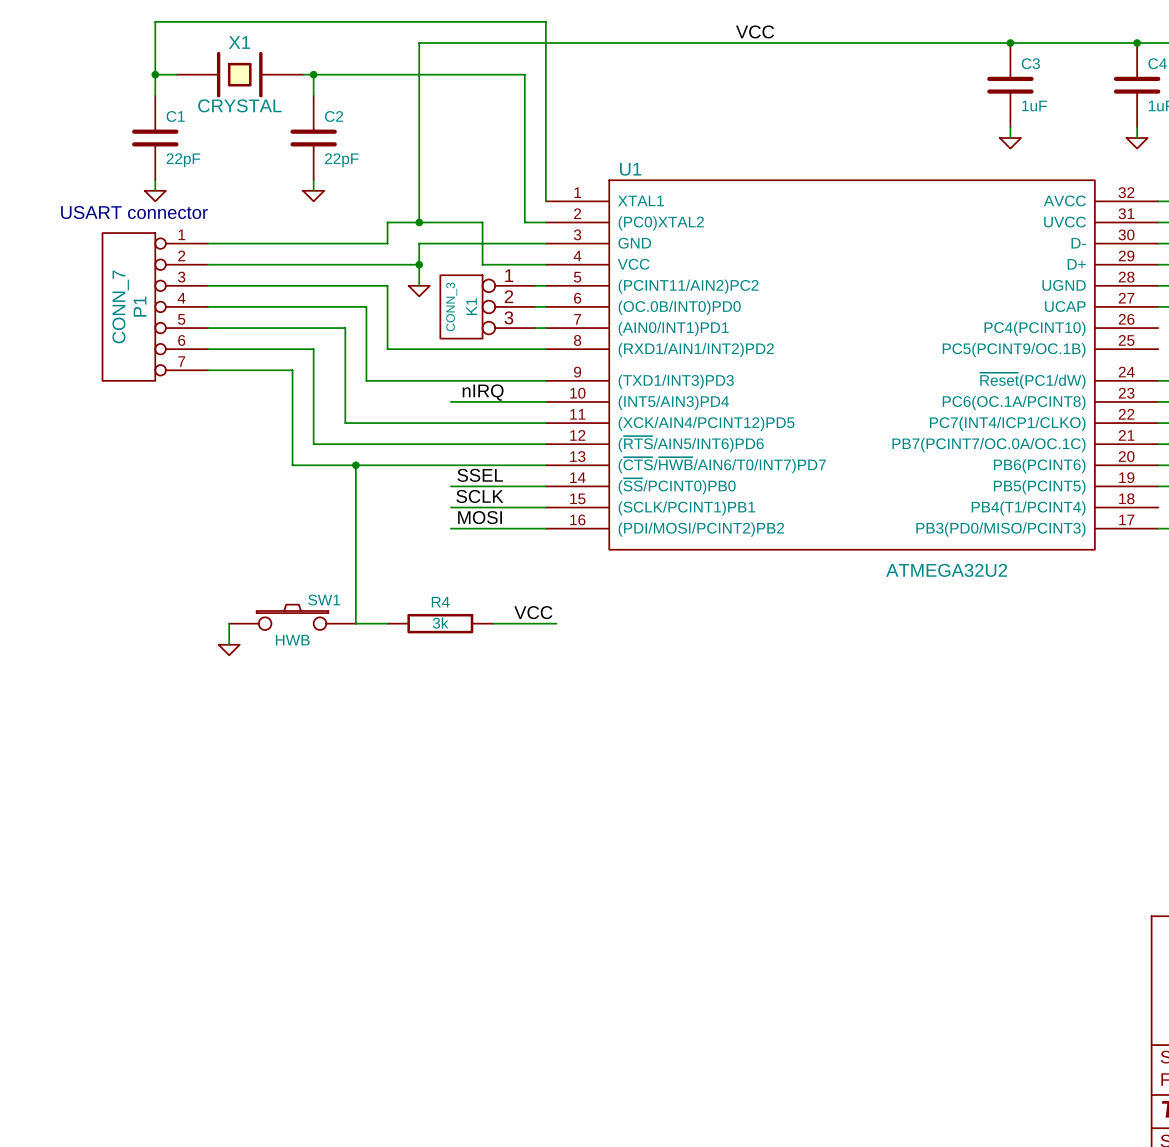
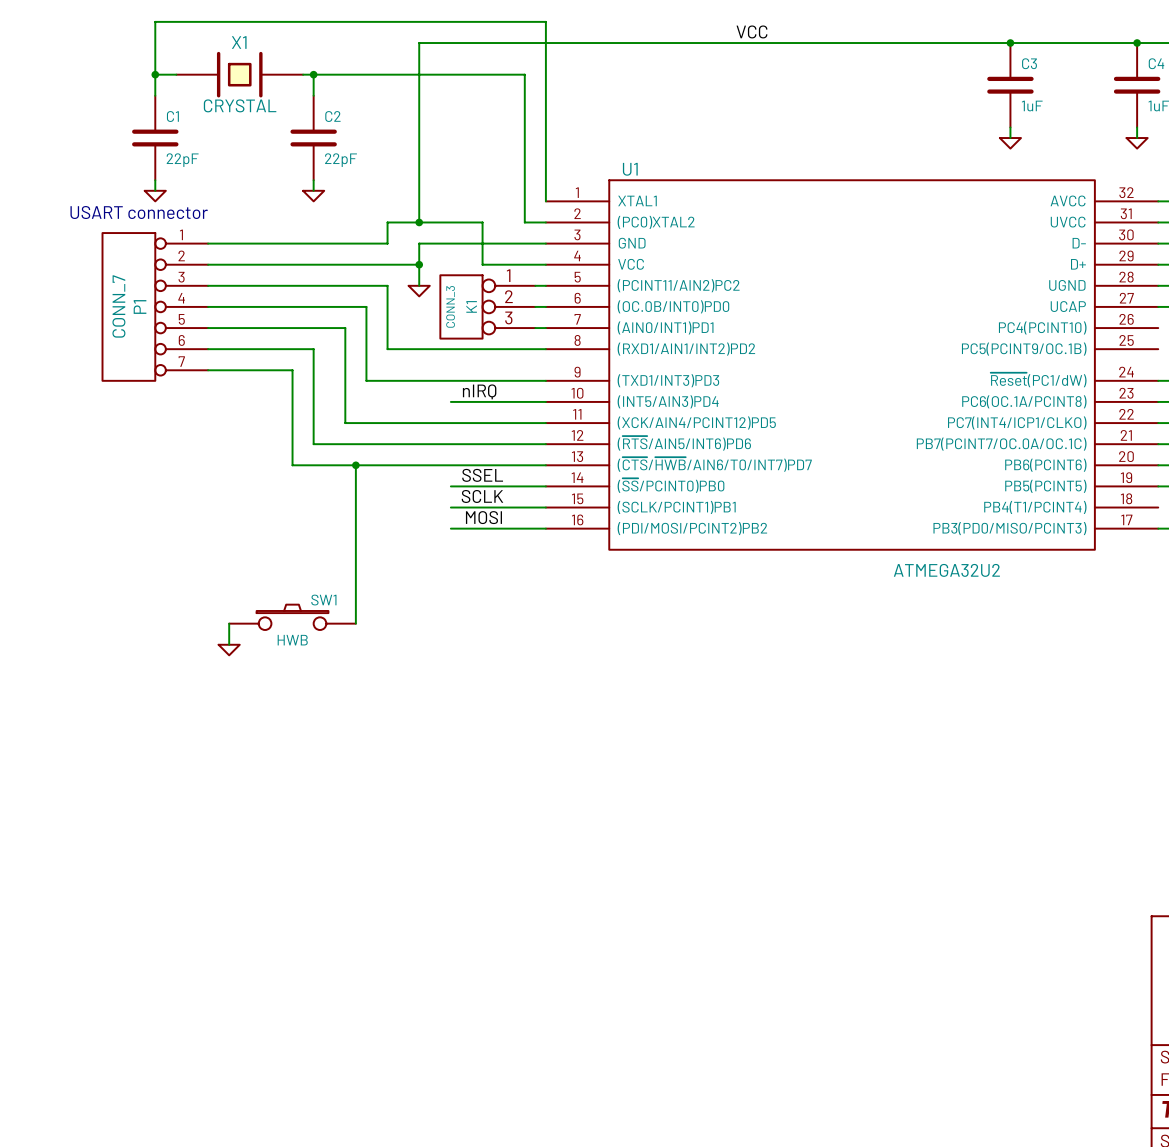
label: VCC (533, 612) -> none
wire: (355, 623) (387, 623) -> none
R4: 3k (440, 623) -> none
wire: (493, 623) (556, 623) -> none

